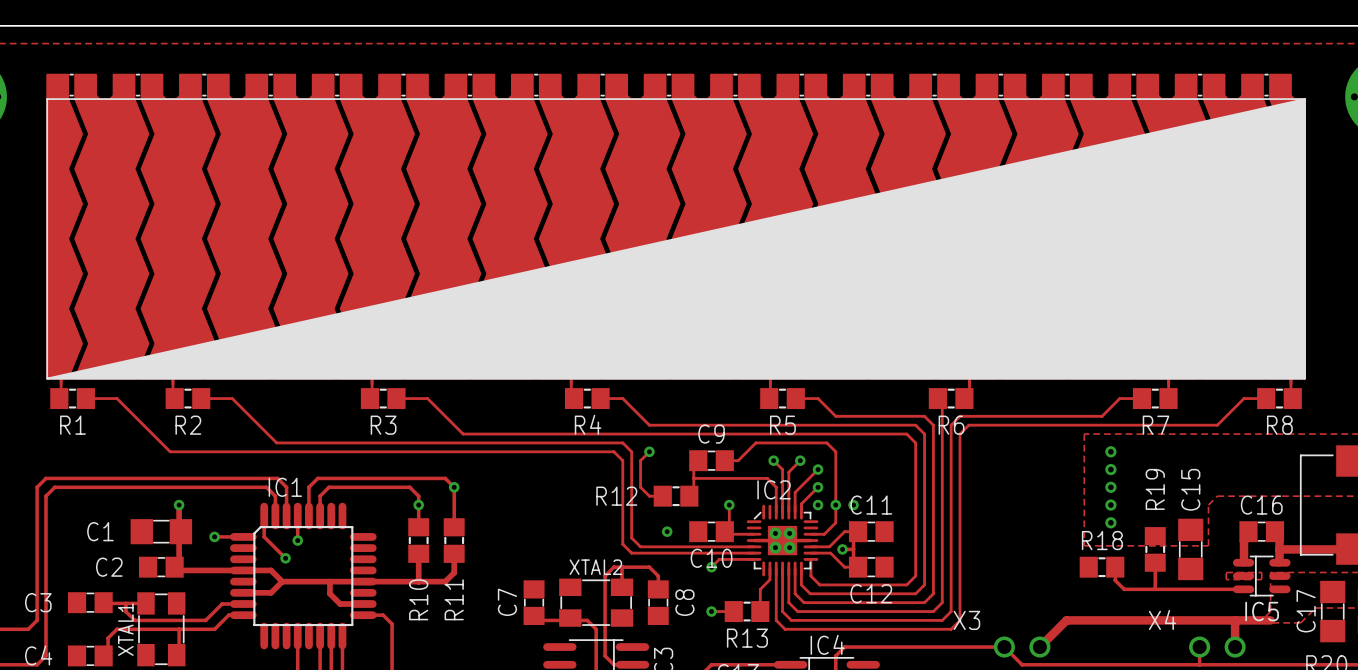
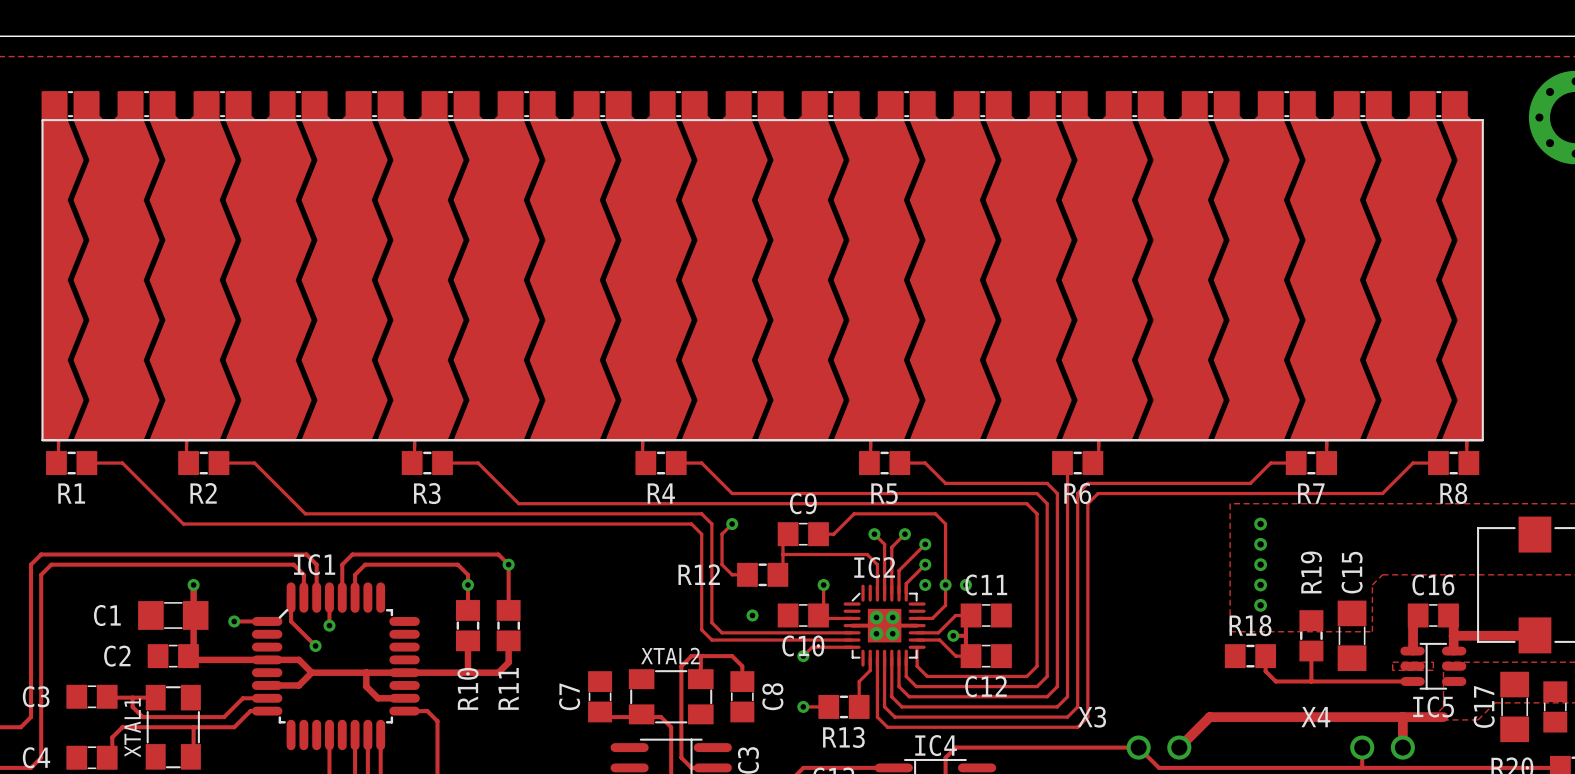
part footprint: [46, 73, 1306, 386] -> [41, 91, 1484, 449]
IC1 footprint: [230, 502, 377, 650] -> [251, 582, 420, 751]

